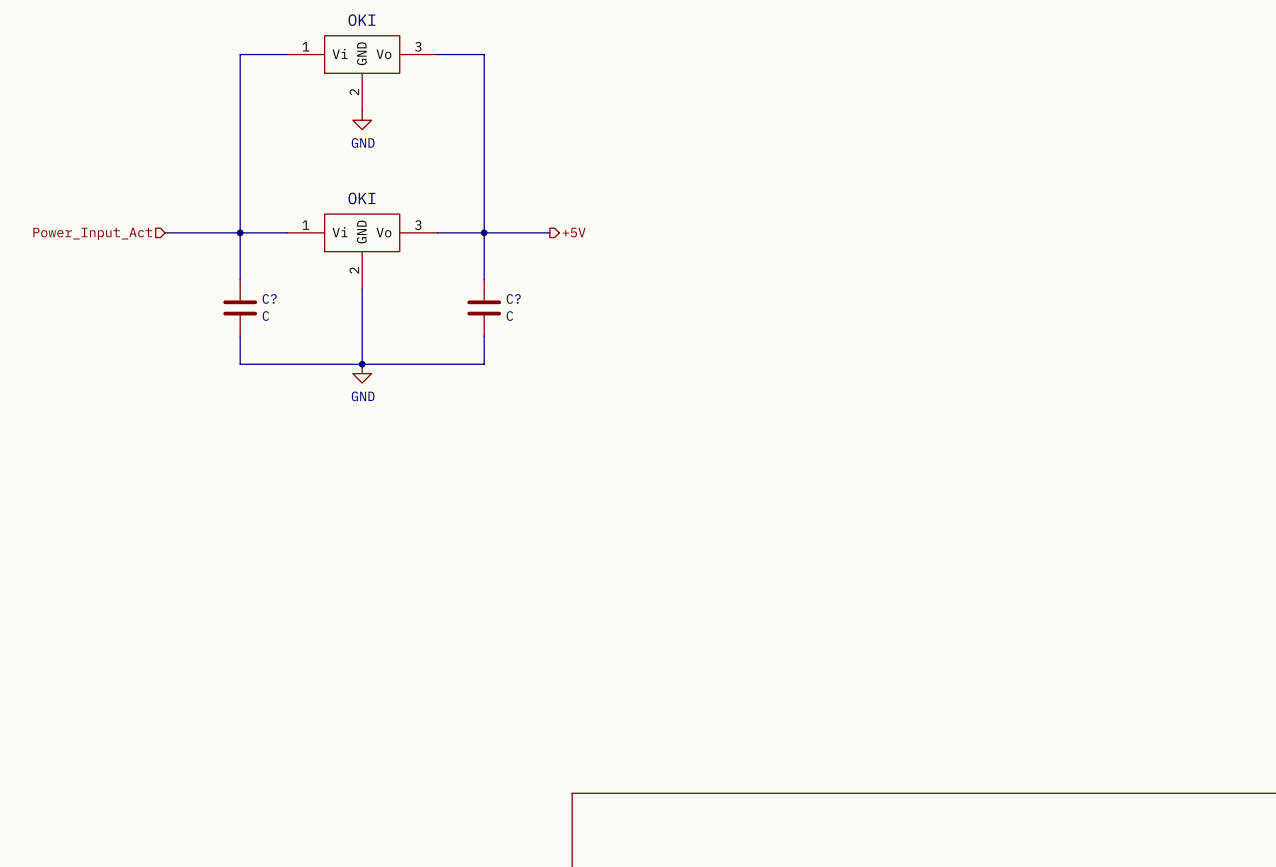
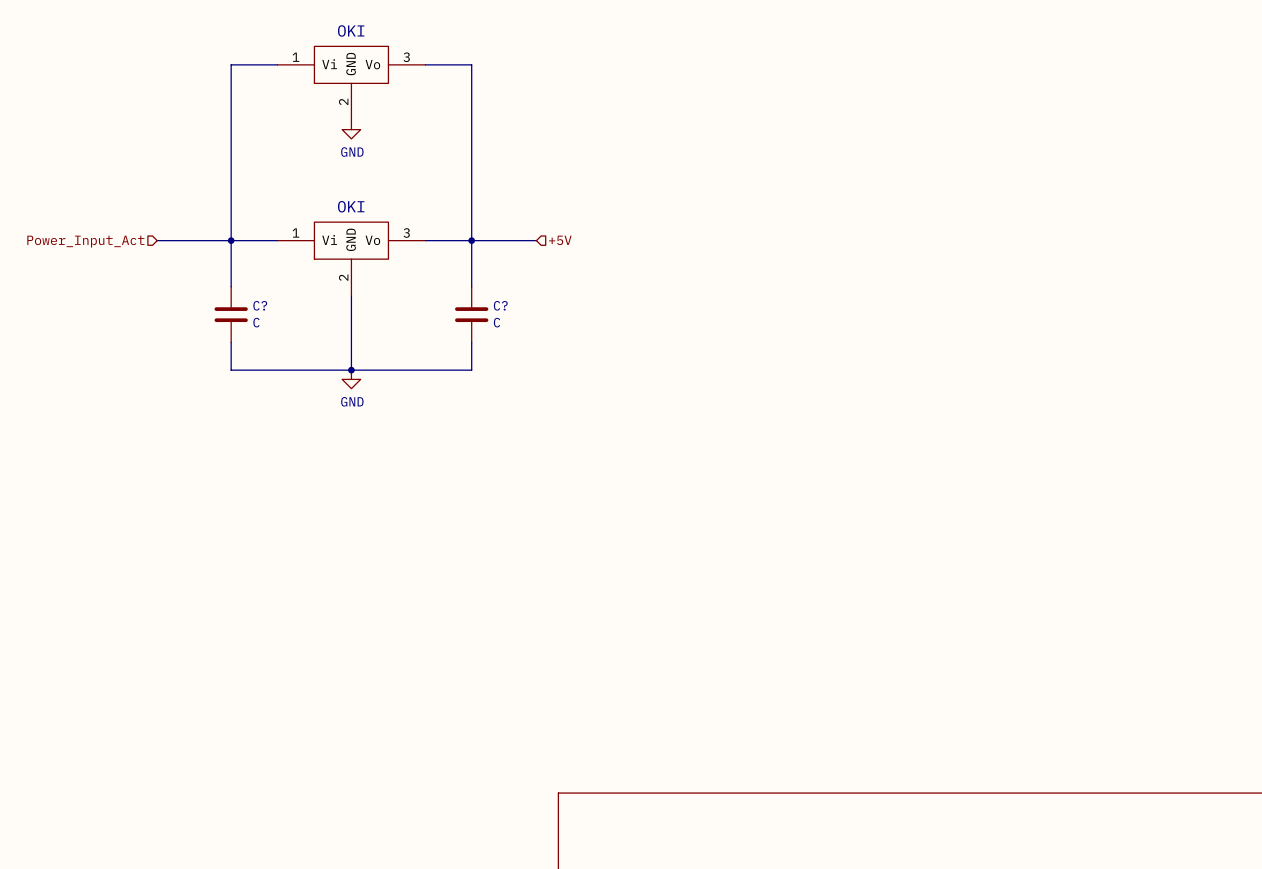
hierarchical label shape: output (574, 232) -> input (560, 240)

